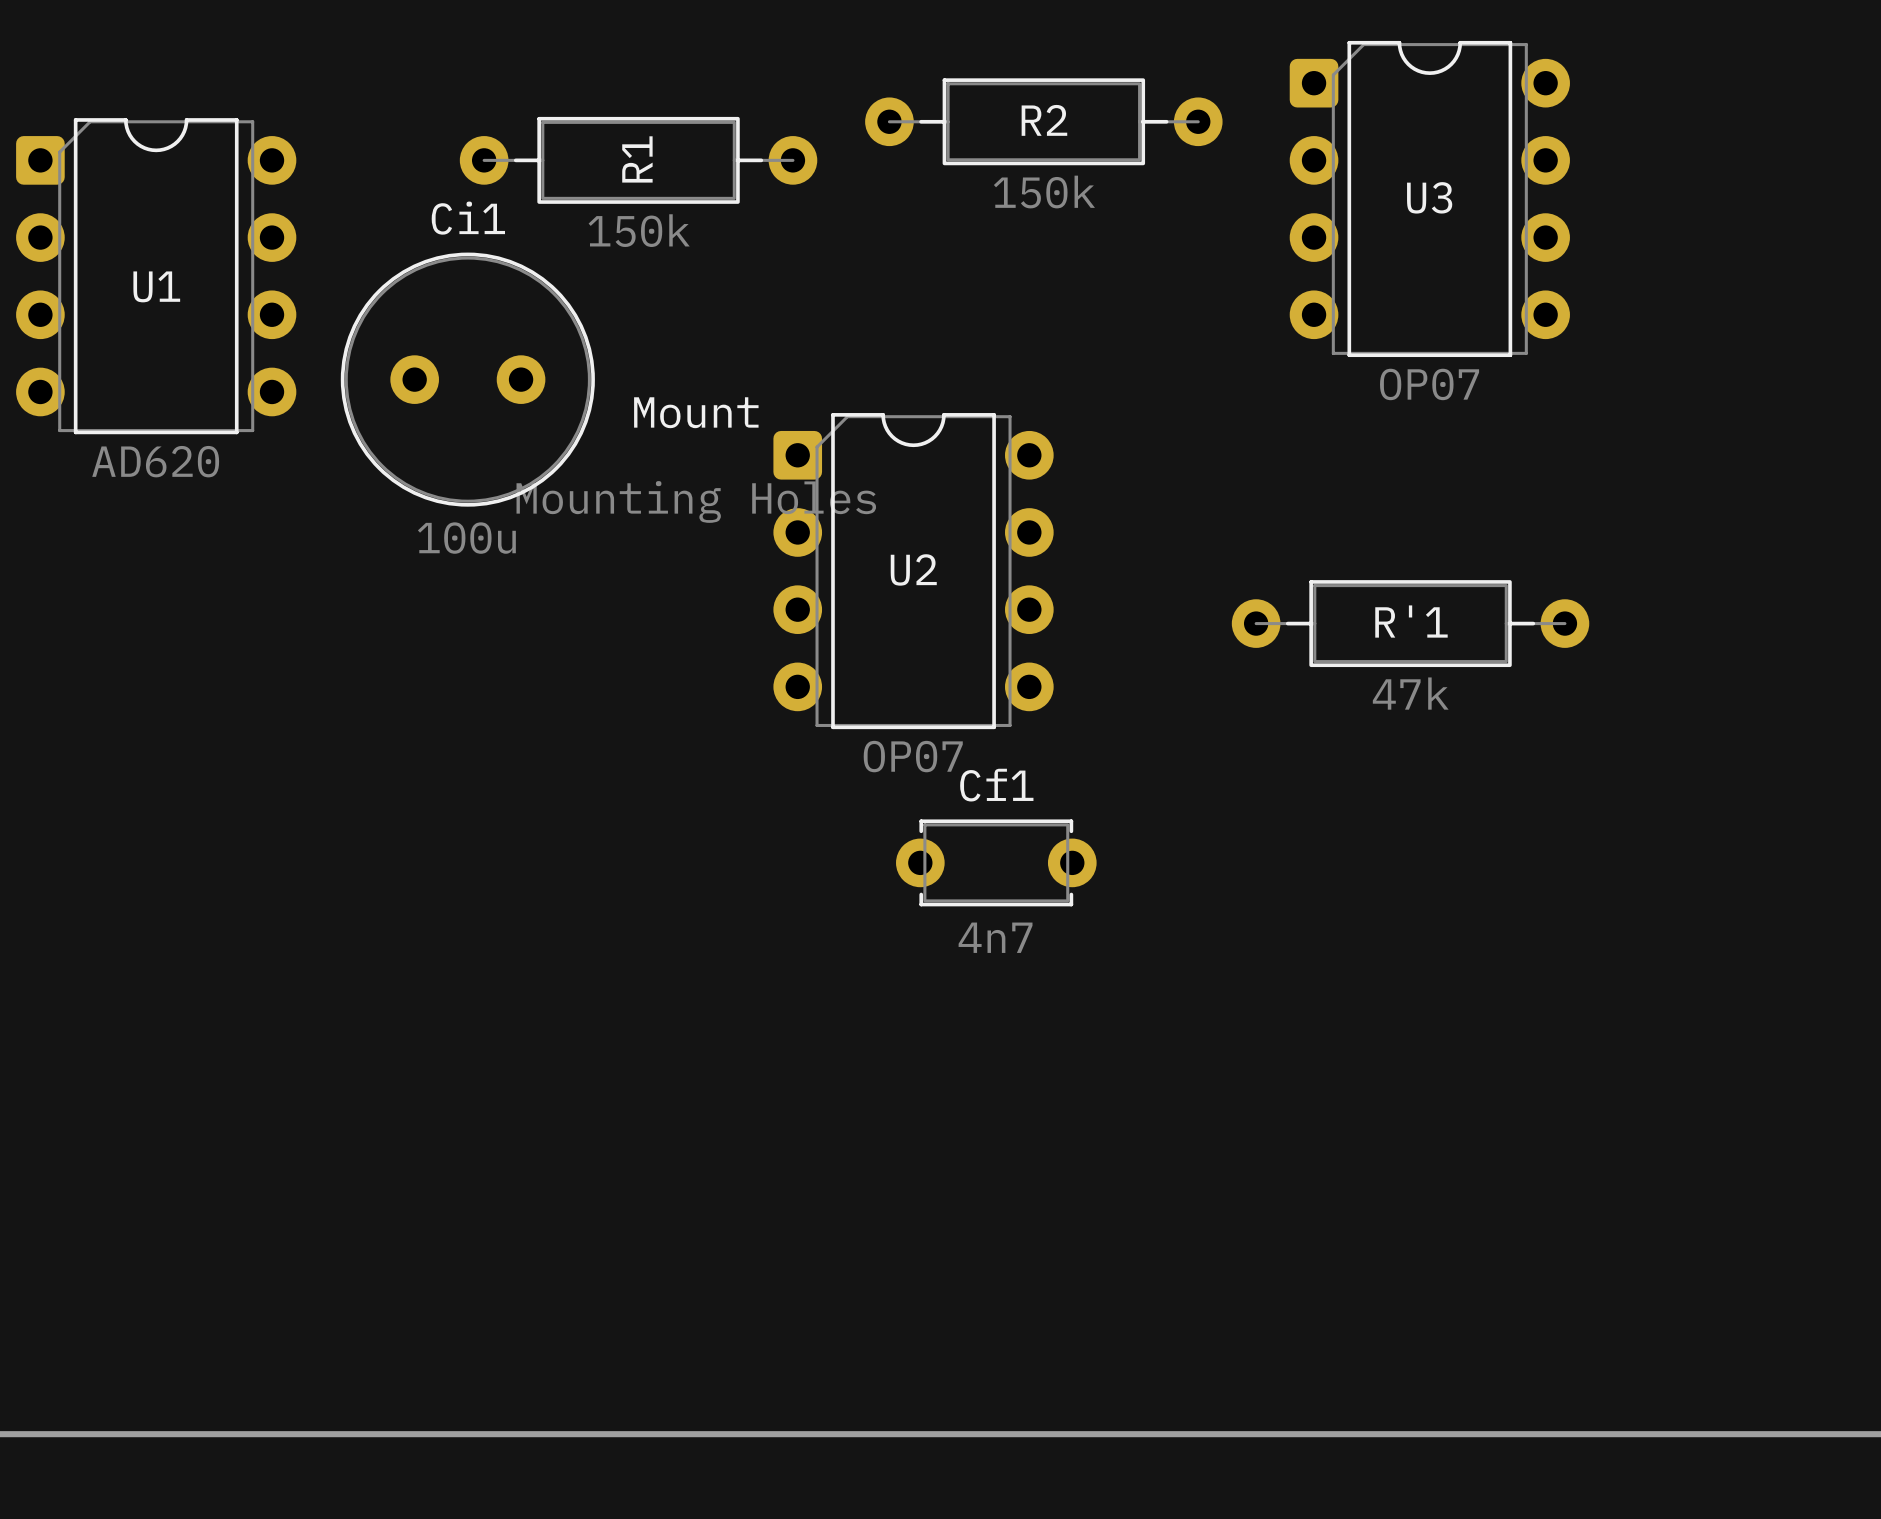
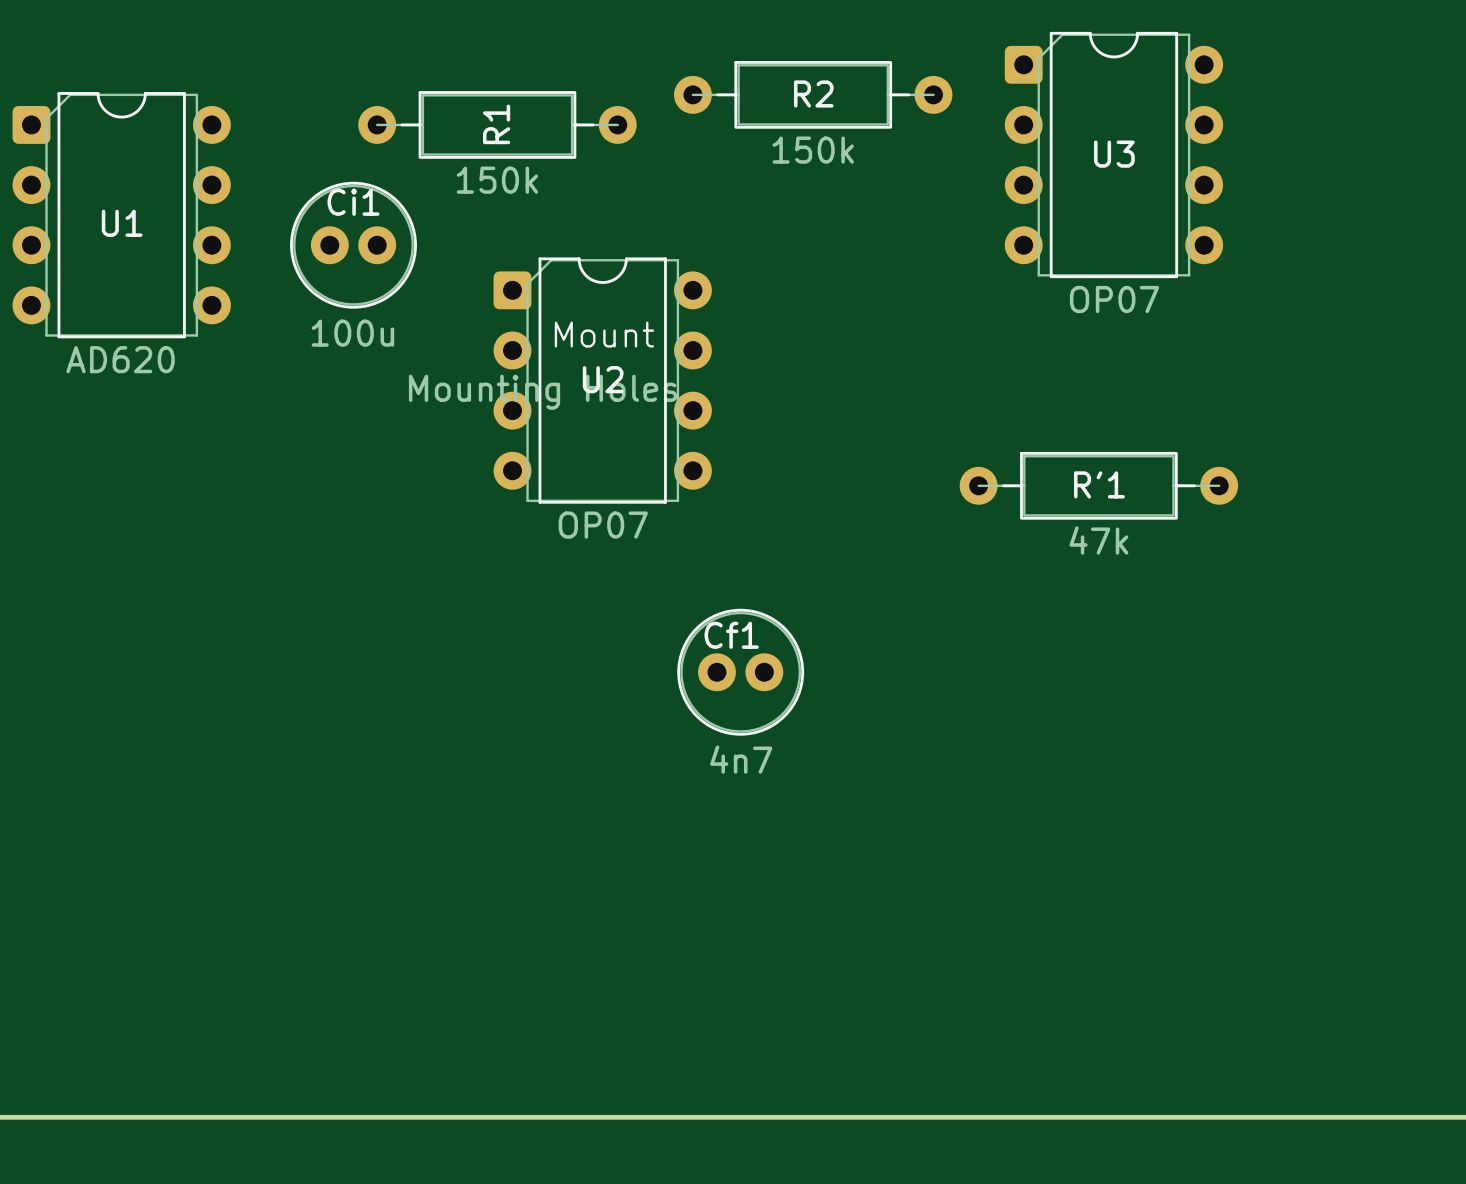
Ci1 name position: Ci1 (468, 218) -> Ci1 (353, 202)
Ci1 footprint: [340, 252, 595, 507] -> [290, 181, 417, 309]
Mount name position: Mount (696, 412) -> Mount (604, 334)
U2 position: (913, 571) -> (602, 380)
Cf1 footprint: [896, 819, 1097, 907] -> [677, 608, 805, 736]

